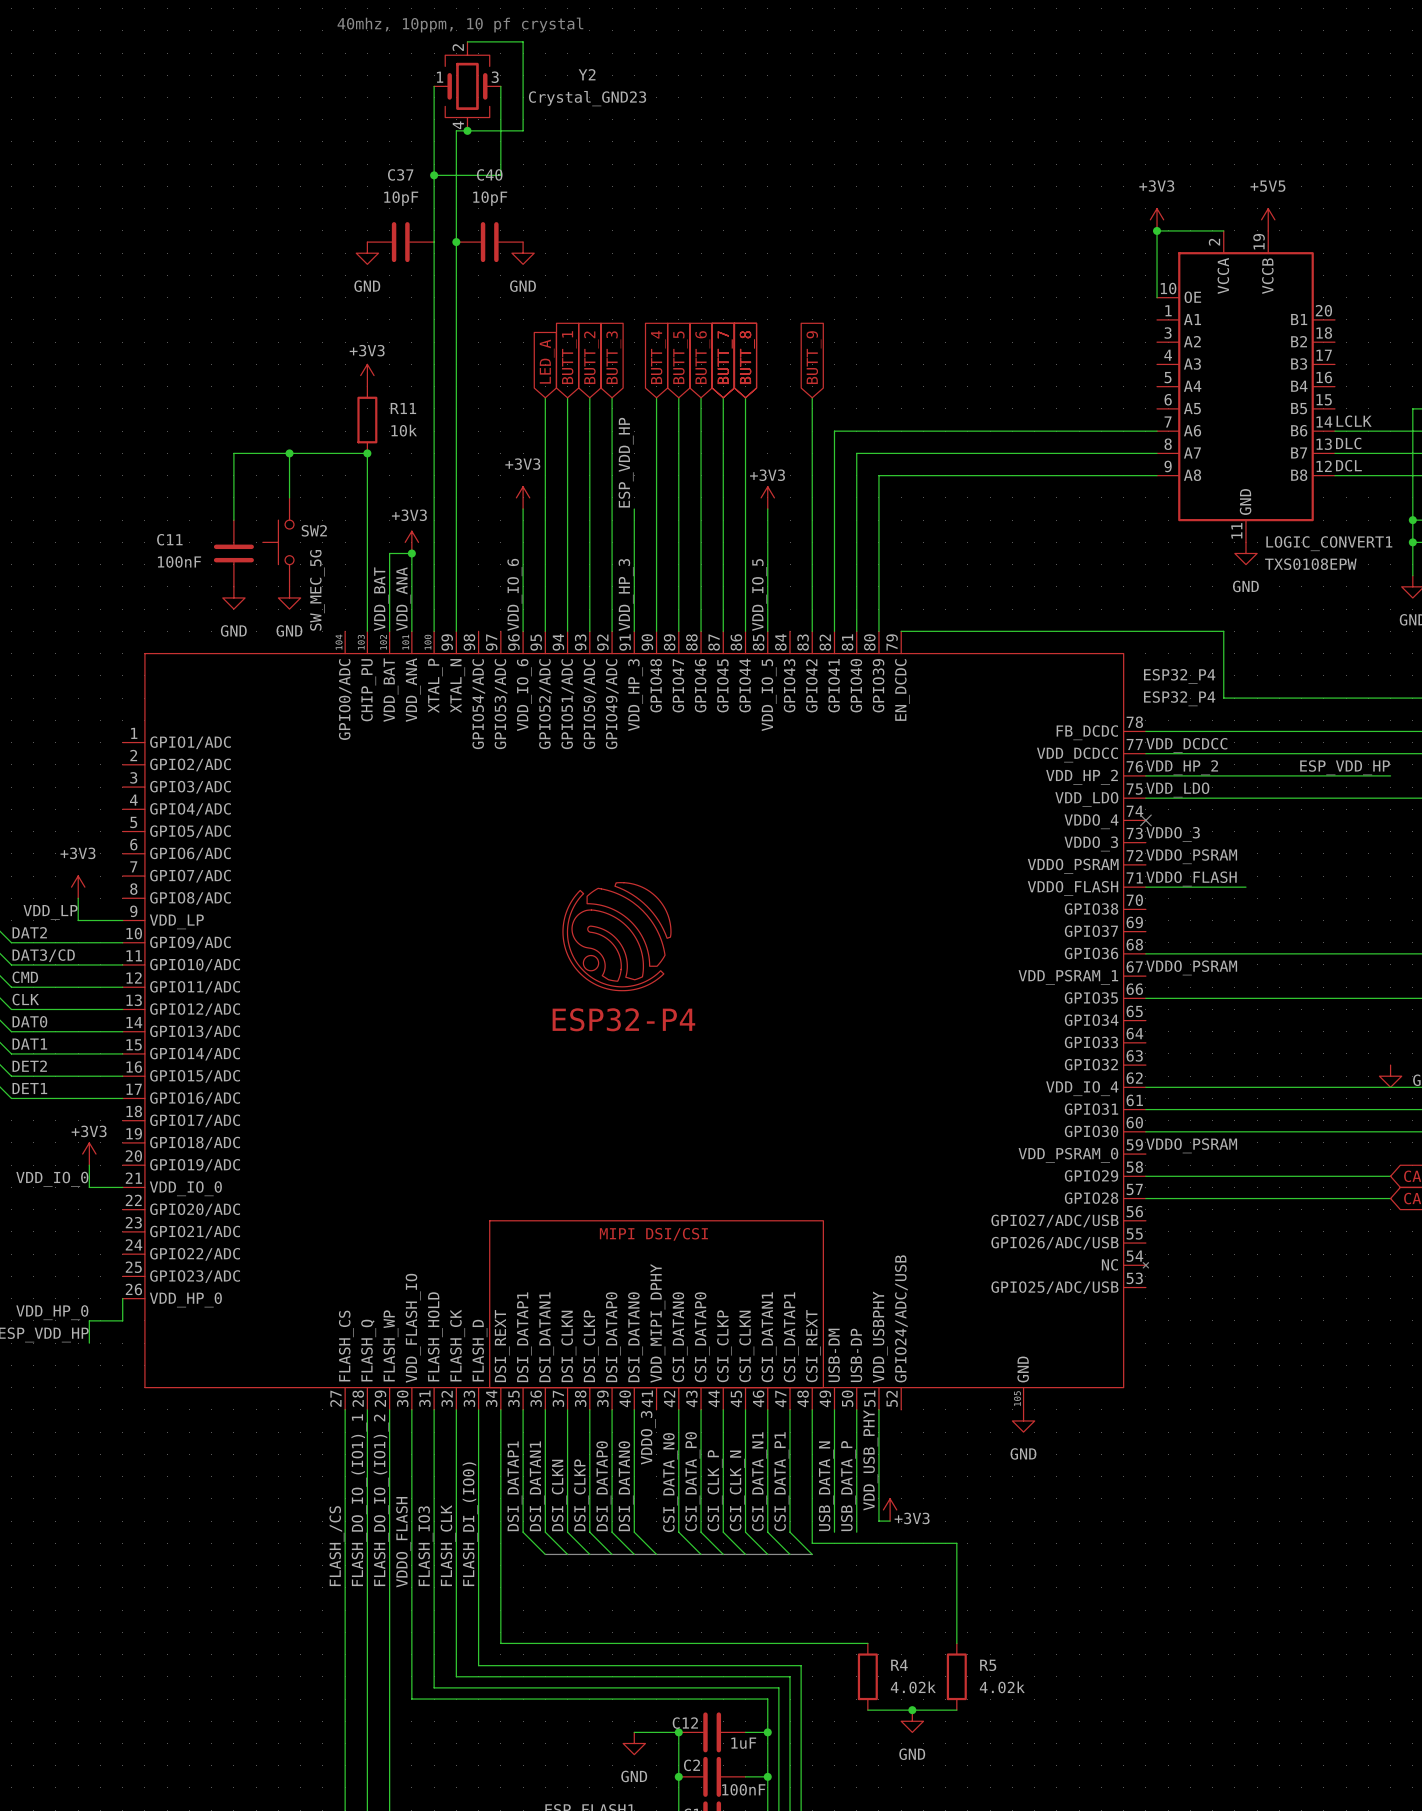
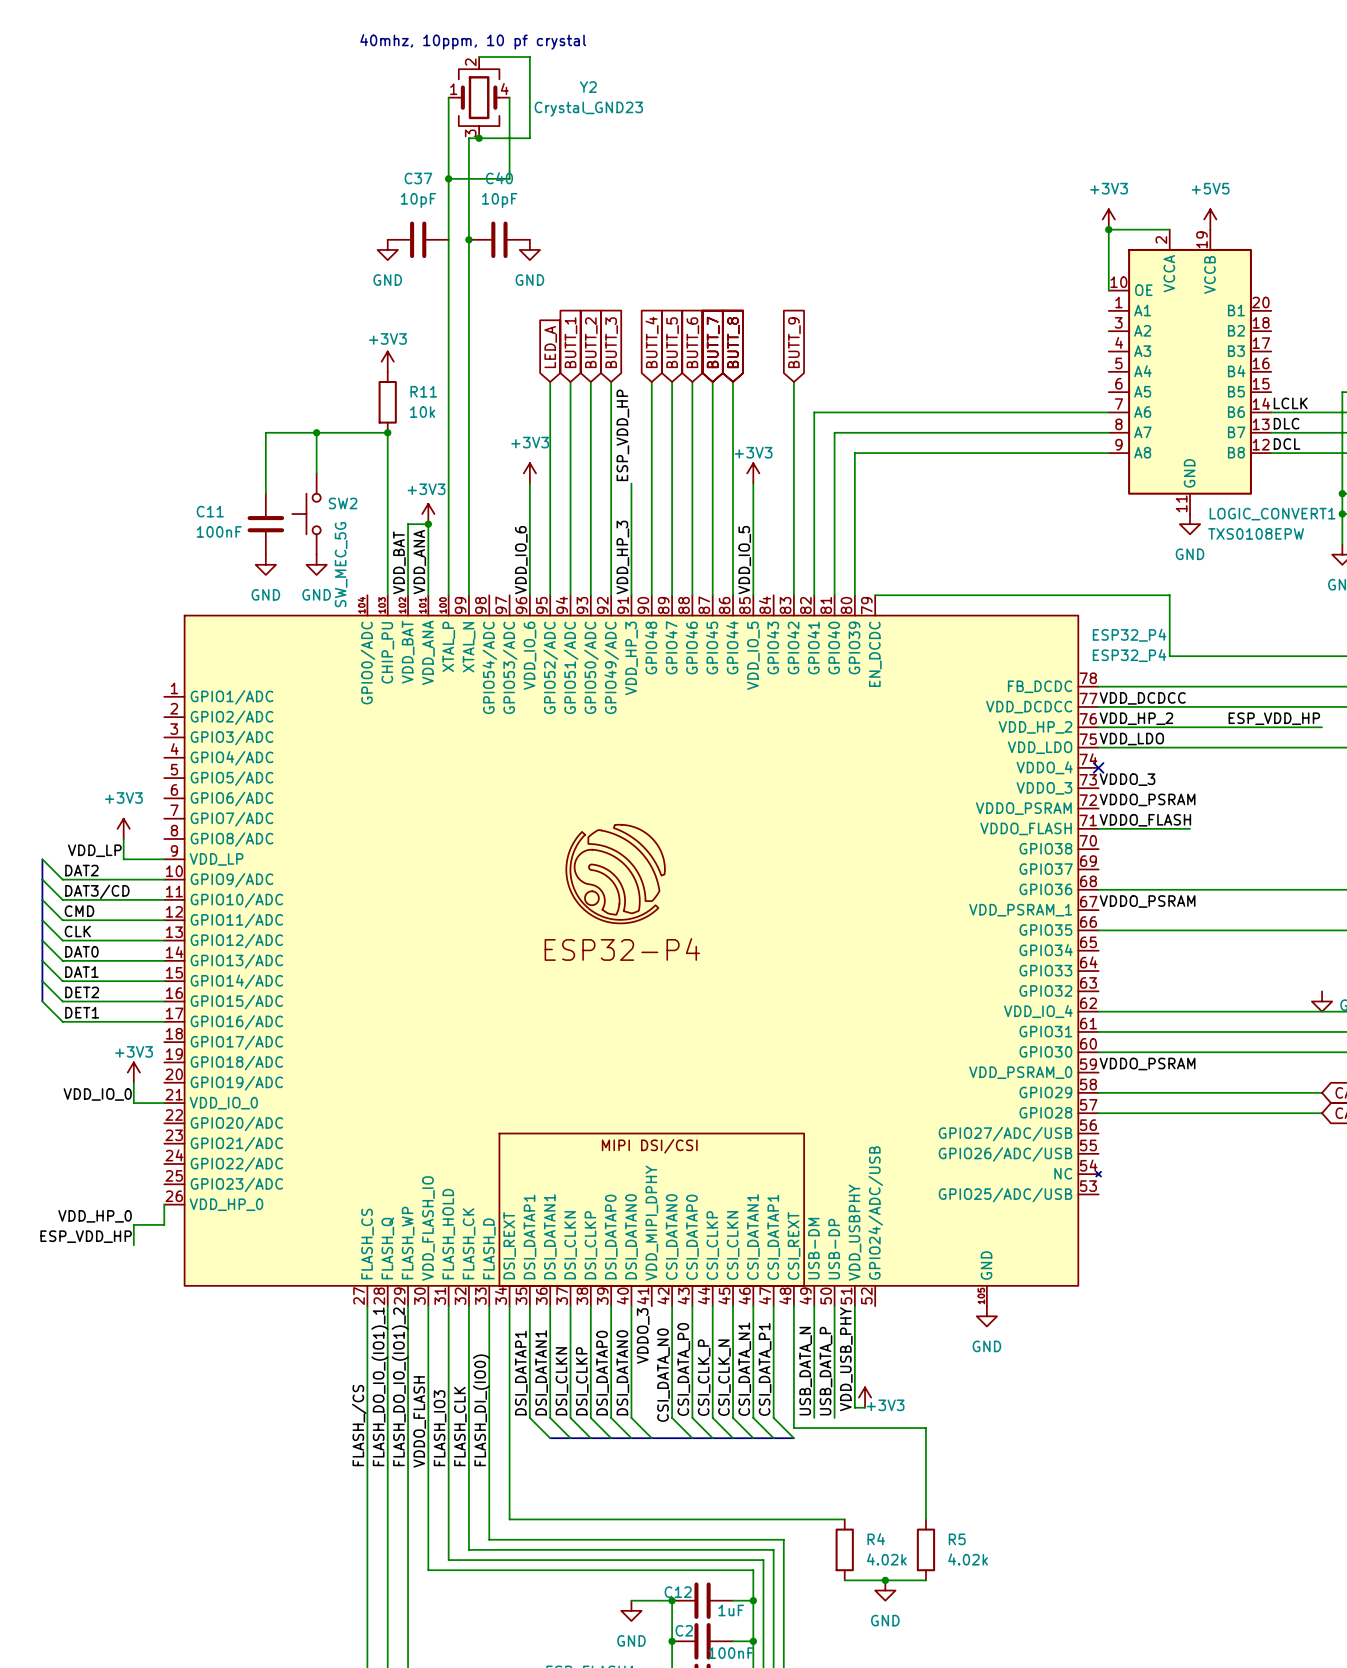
Y2 pin number: 3 (495, 77) -> 4 (504, 89)
Y2 pin number: 4 (458, 125) -> 3 (470, 133)

